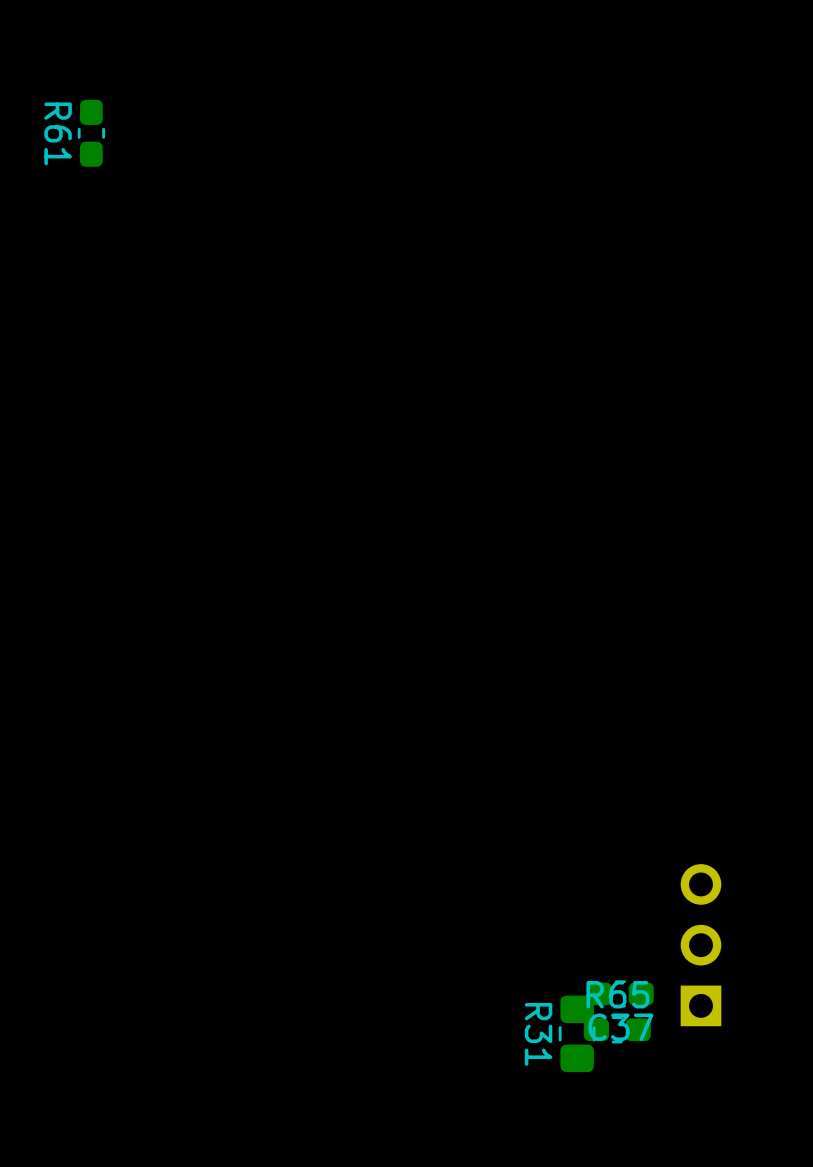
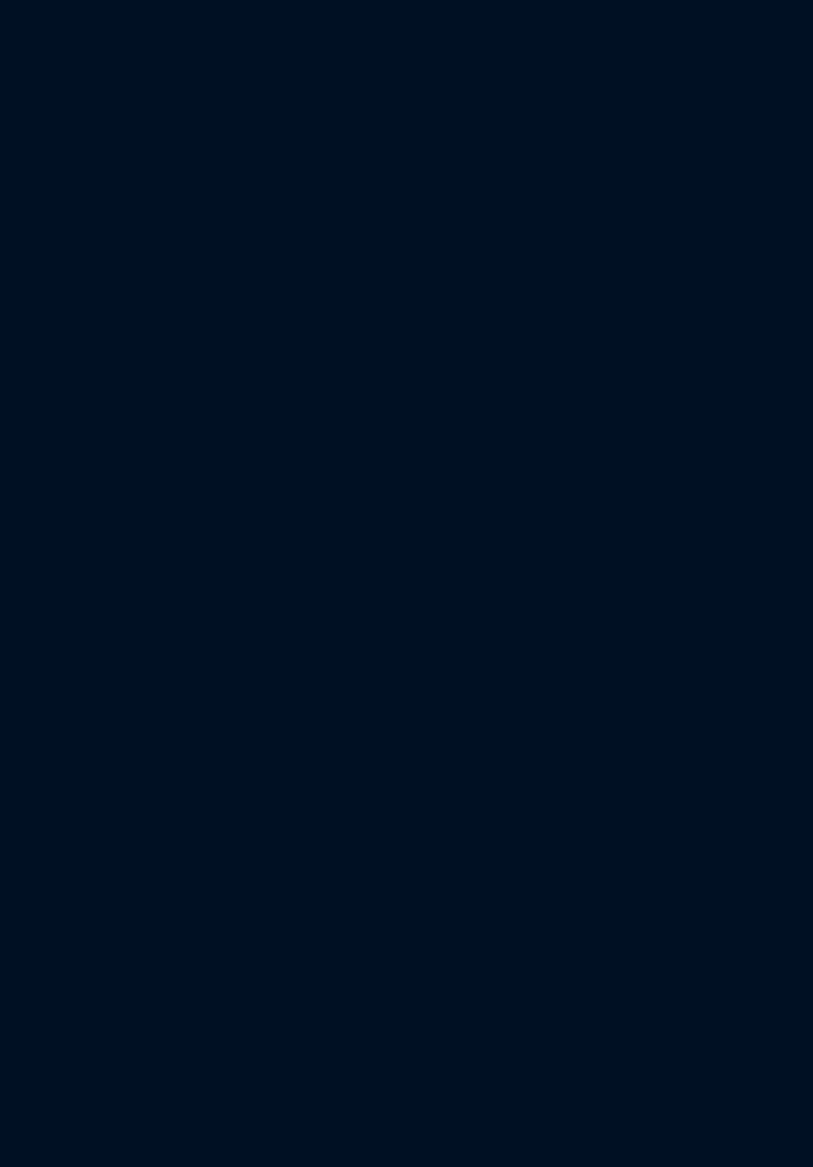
R61: (91, 133) -> none
part: (700, 945) -> none
C37: (620, 993) -> none
R65: (617, 1029) -> none
R31: (577, 1033) -> none

